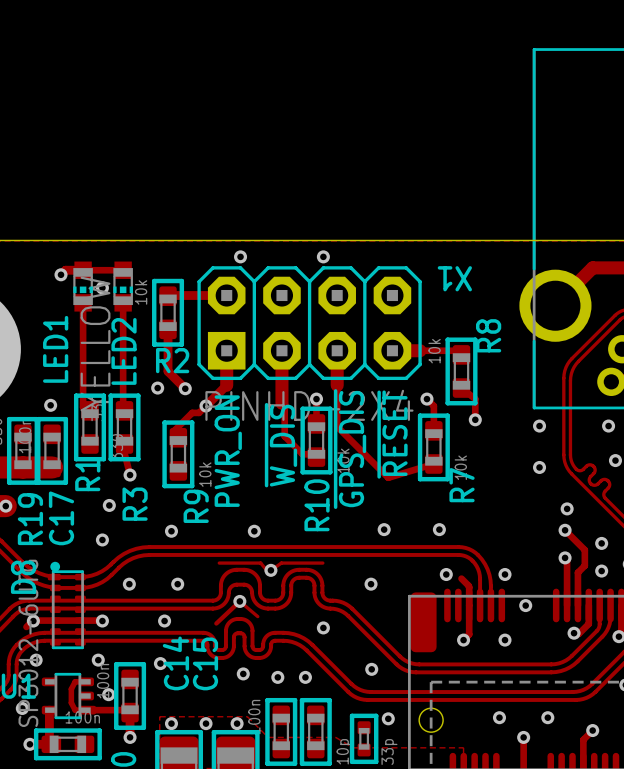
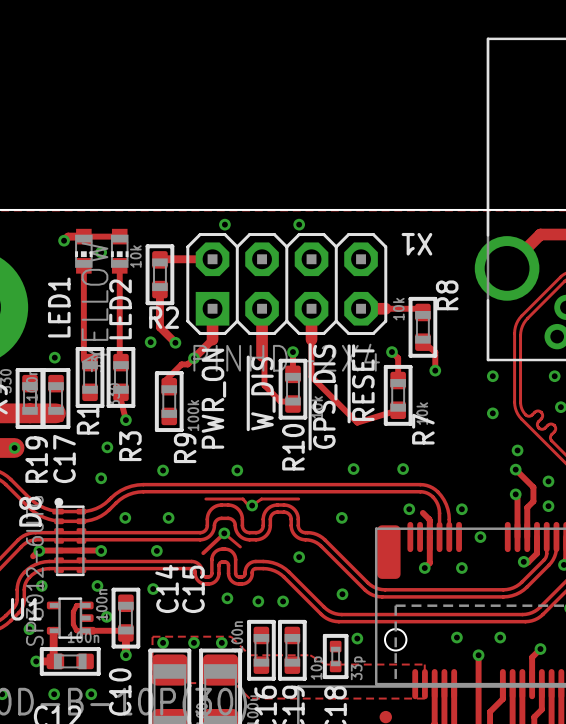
R9 value: 10k (205, 474) -> 100k (193, 415)

